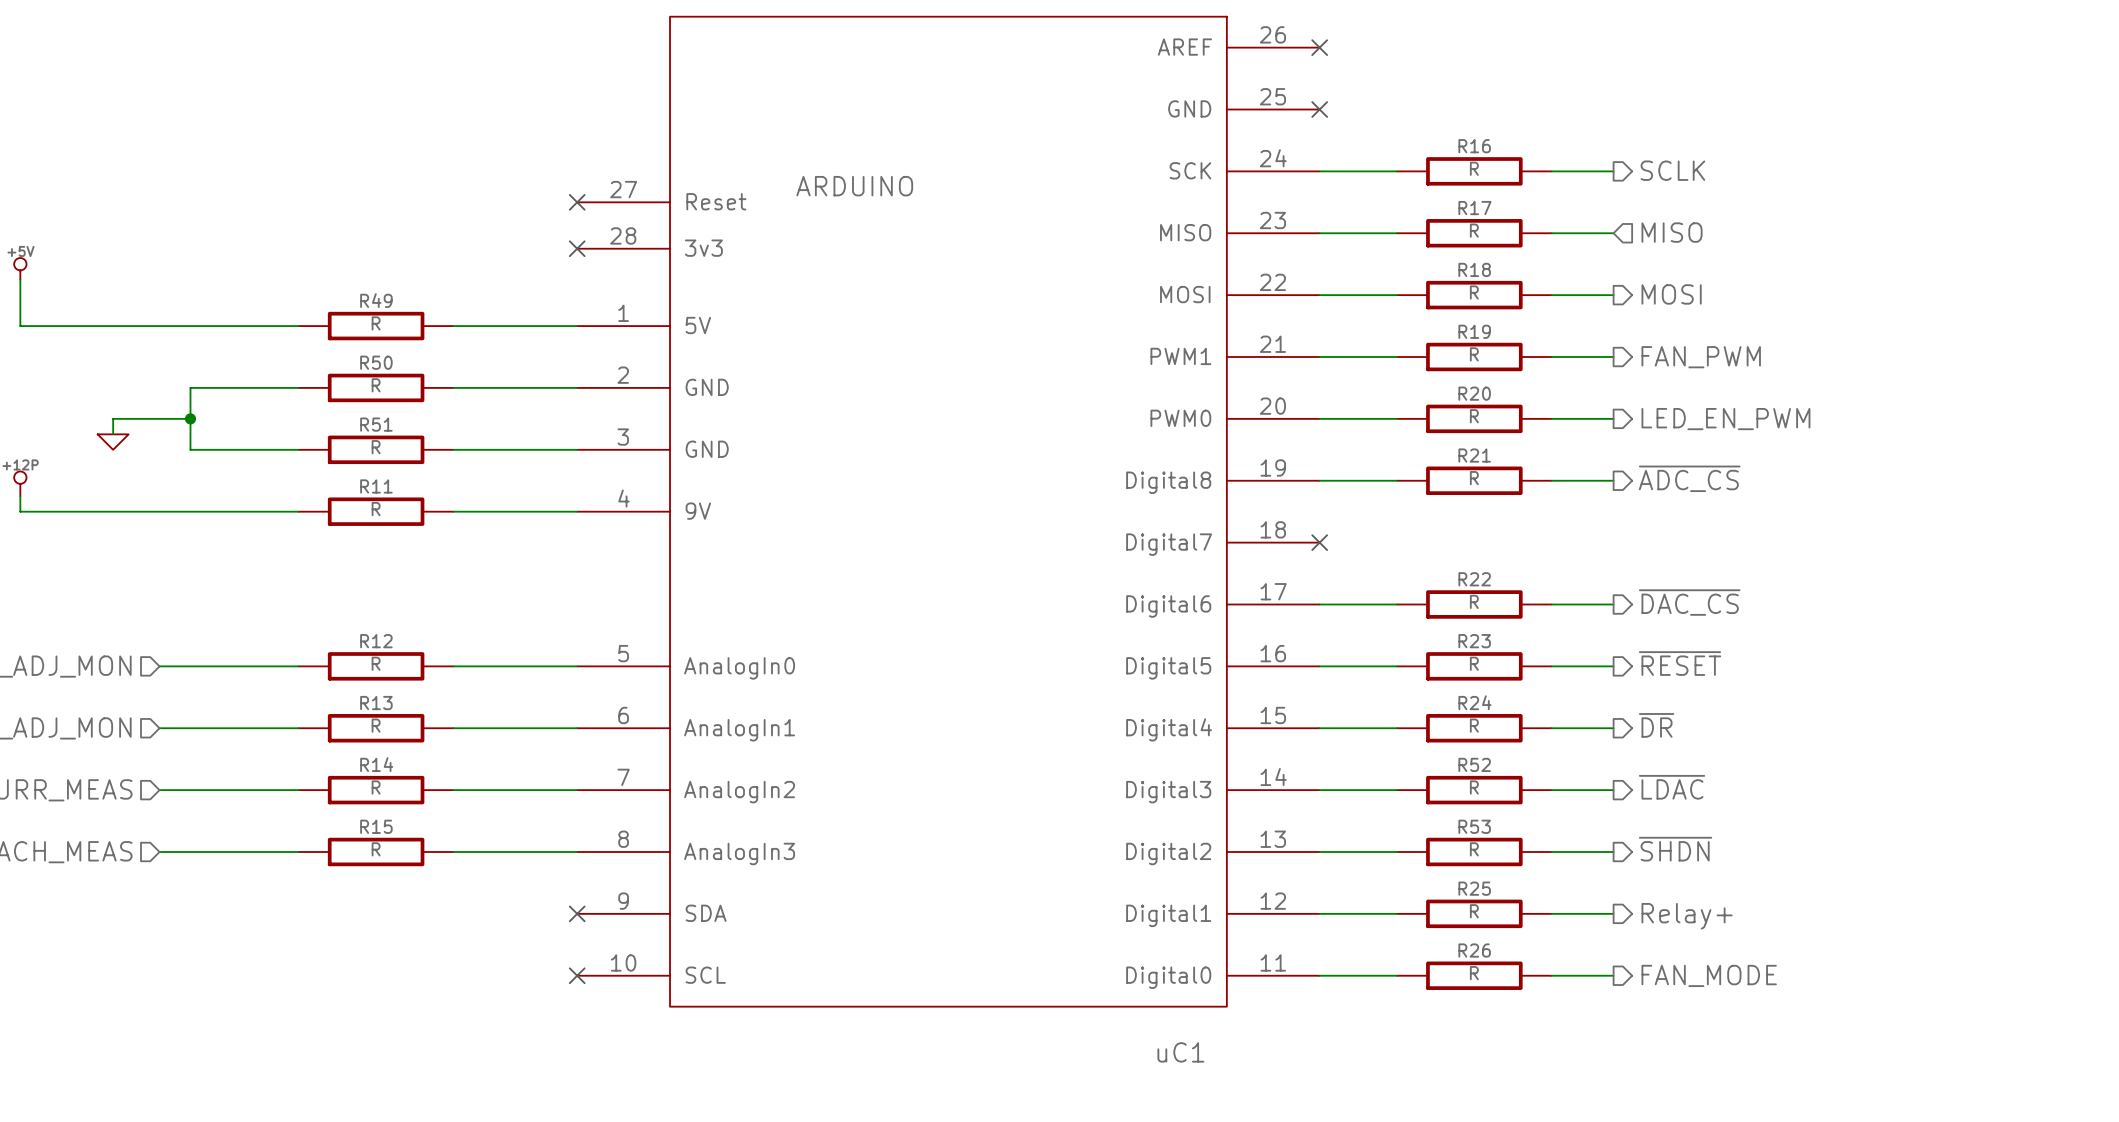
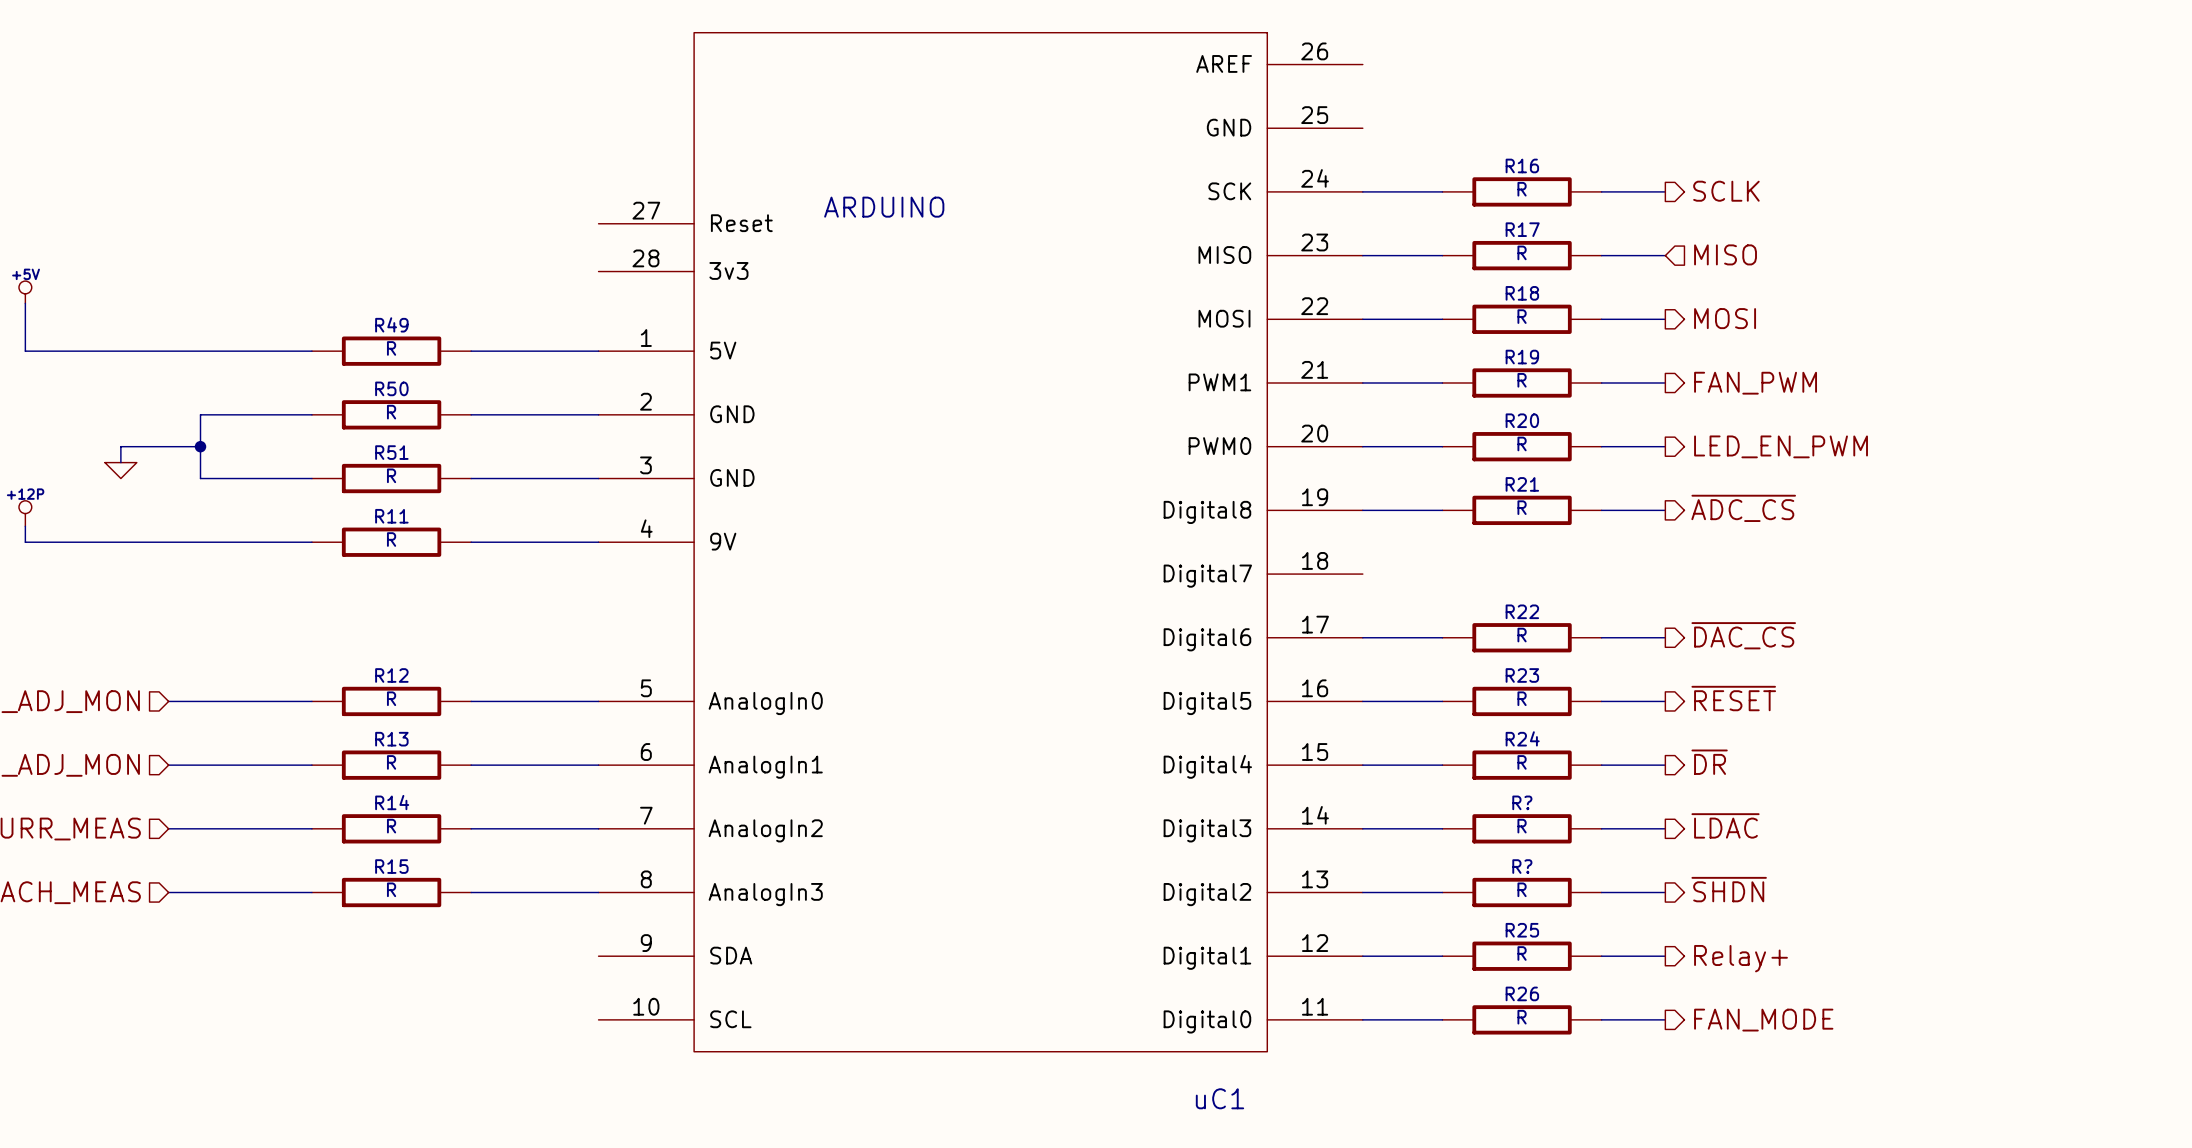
no-connect mark: (1319, 47) -> none
no-connect mark: (1319, 109) -> none
no-connect mark: (577, 202) -> none
no-connect mark: (577, 248) -> none
no-connect mark: (1319, 542) -> none
R52 name: R52 (1474, 764) -> R? (1522, 802)
R53 name: R53 (1474, 826) -> R? (1522, 866)
no-connect mark: (577, 913) -> none
no-connect mark: (577, 975) -> none

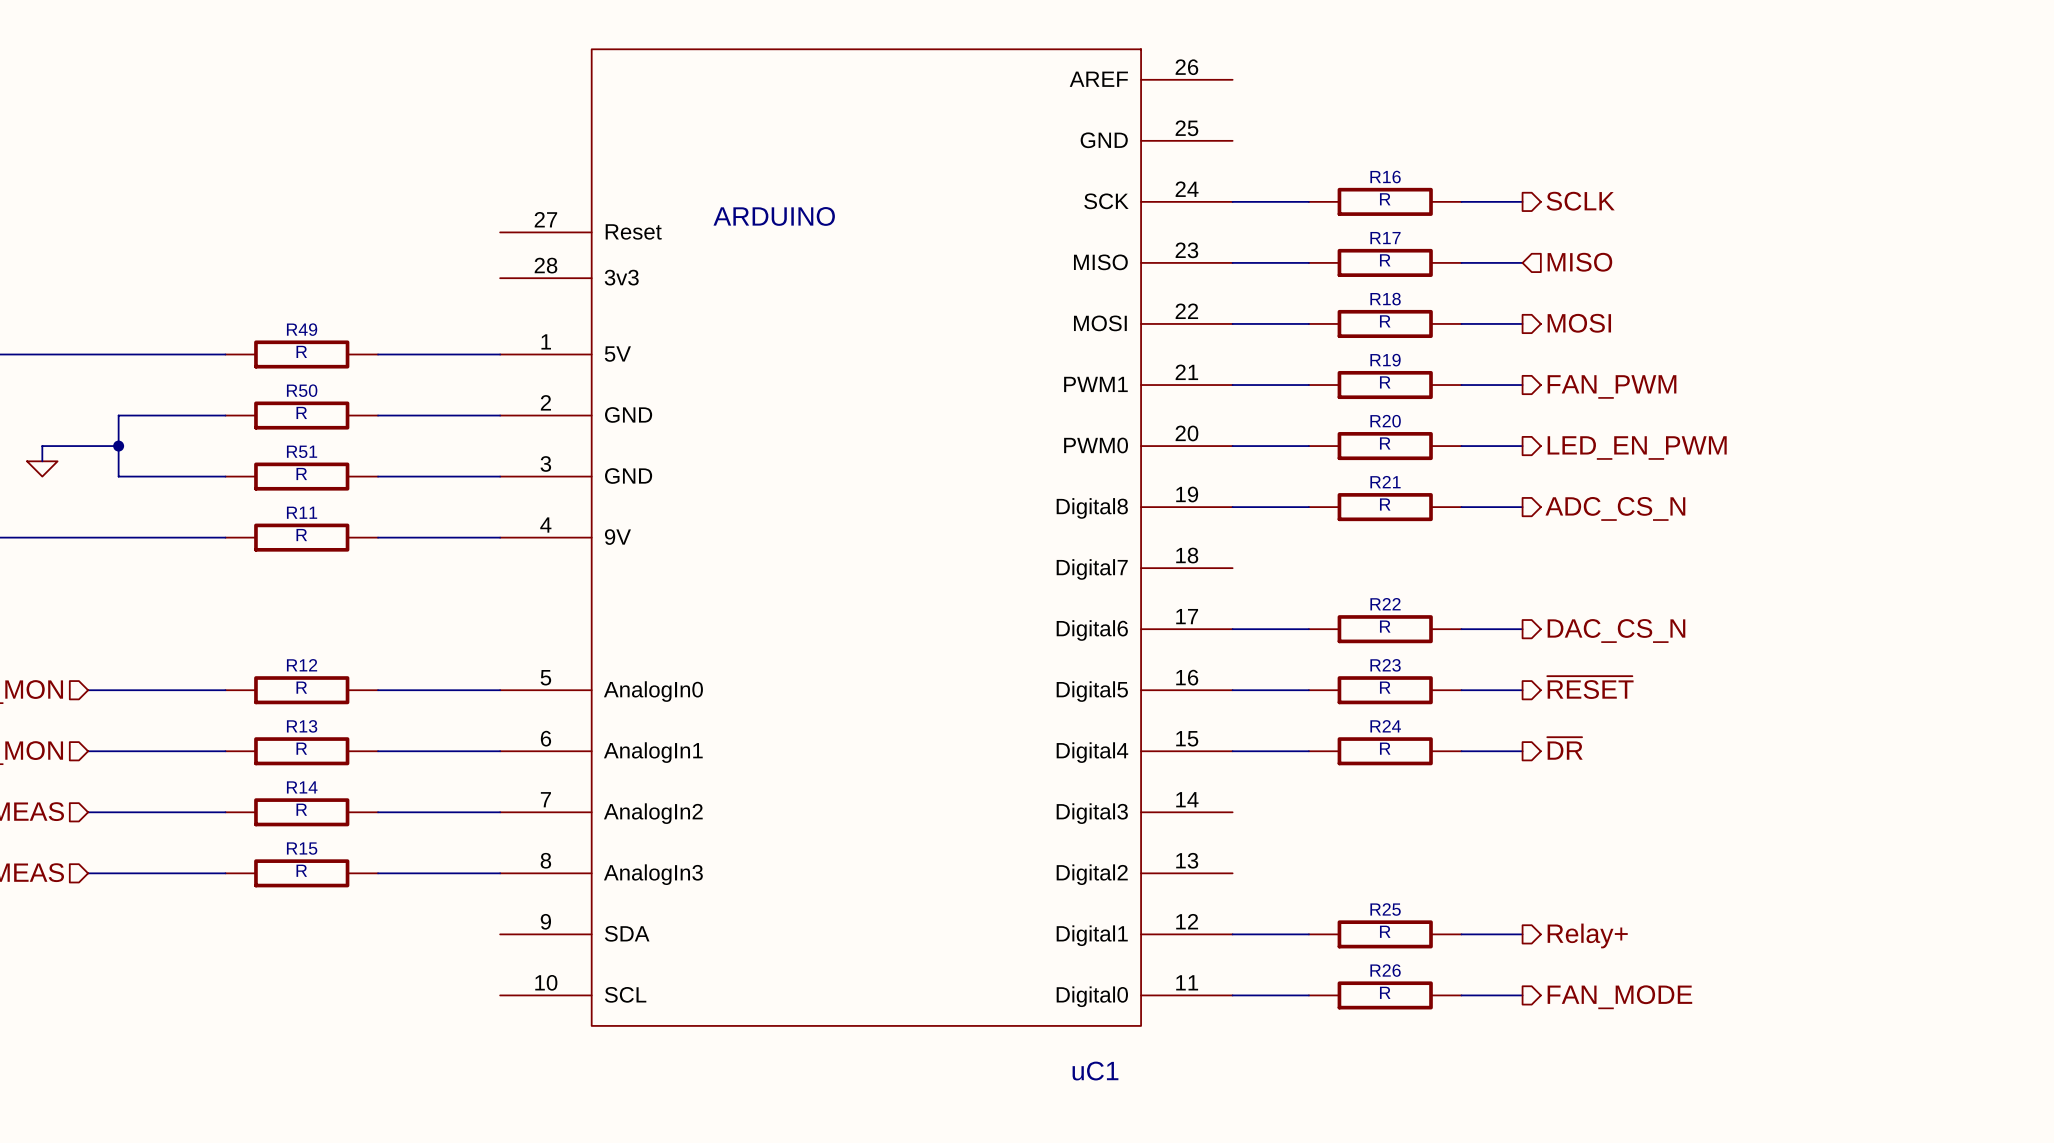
hierarchical label: ~{ADC_CS} (1743, 508) -> ADC_CS_N (1615, 508)
hierarchical label: ~{DAC_CS} (1743, 635) -> DAC_CS_N (1616, 631)
hierarchical label: ~{LDAC} (1725, 825) -> none
wire: (1362, 828) (1442, 828) -> none
R?: R (1522, 828) -> none
wire: (1601, 828) (1665, 828) -> none
hierarchical label: ~{SHDN} (1729, 889) -> none
wire: (1362, 892) (1442, 892) -> none
R?: R (1522, 892) -> none
wire: (1601, 892) (1665, 892) -> none

